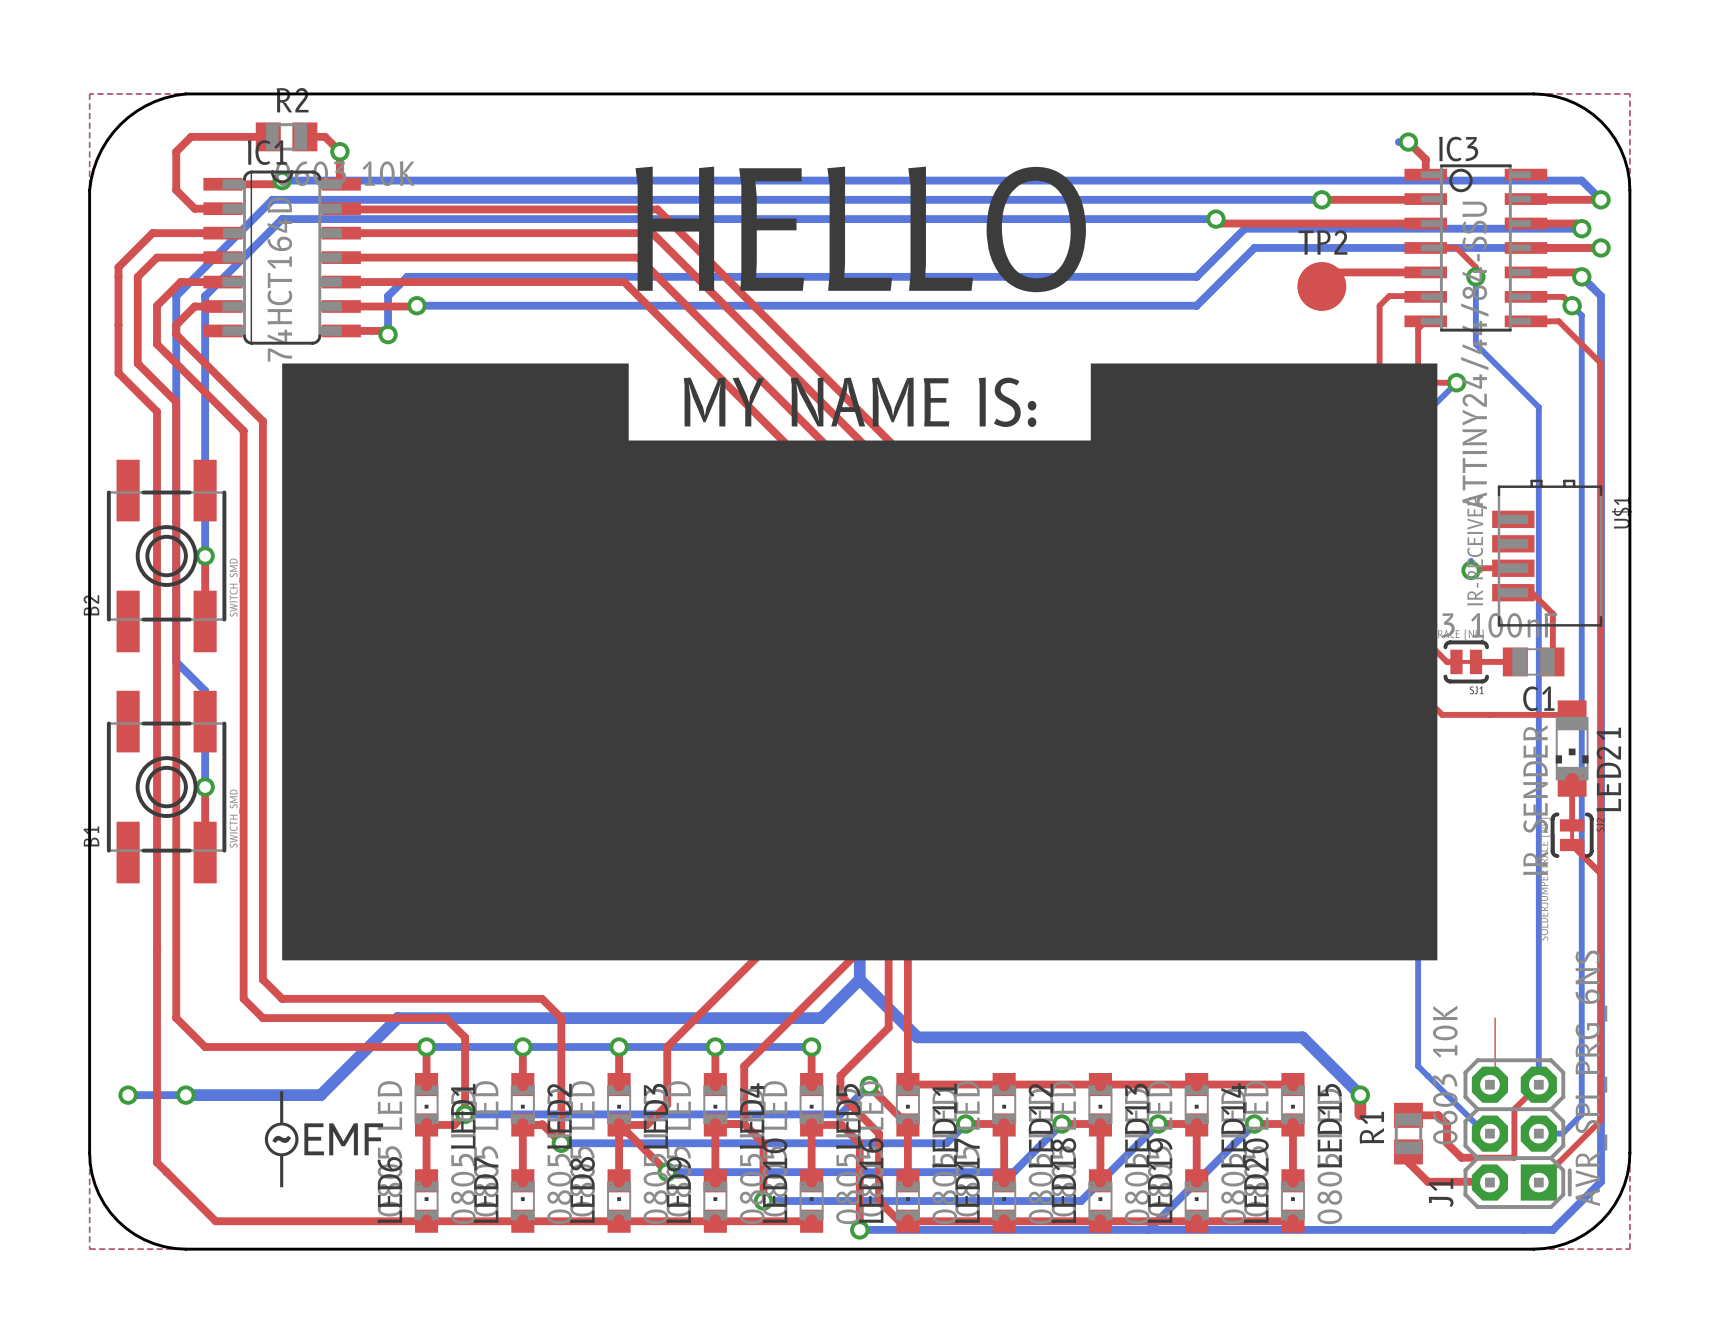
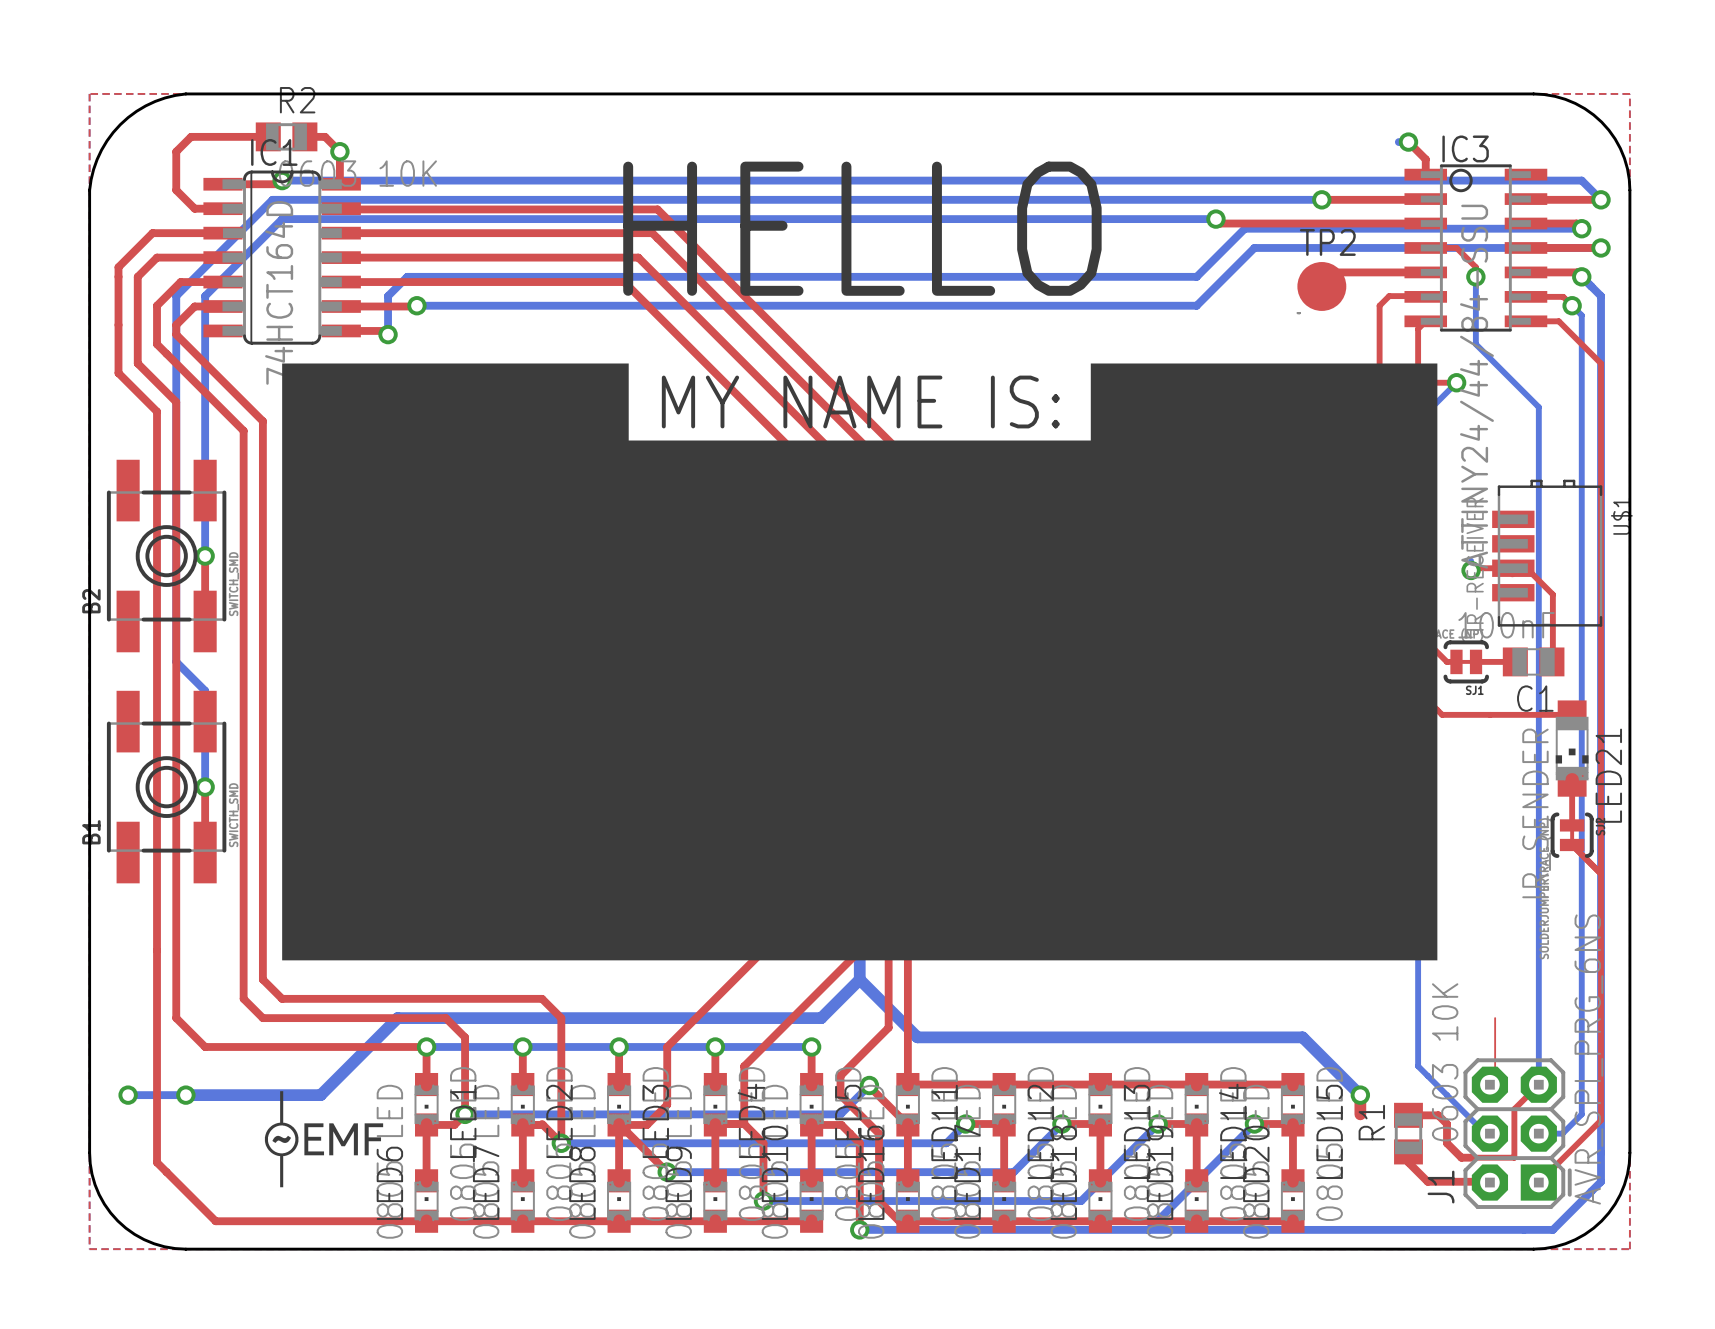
top track: (1512, 593) (1531, 592) (1552, 613) -> (1512, 574) (1531, 573) (1552, 594) (1552, 613)

